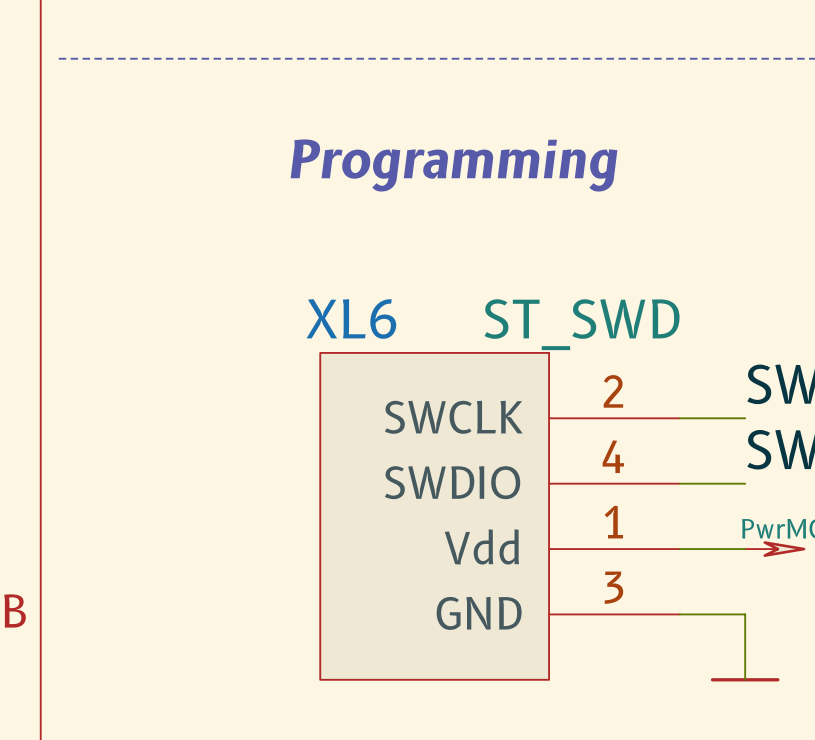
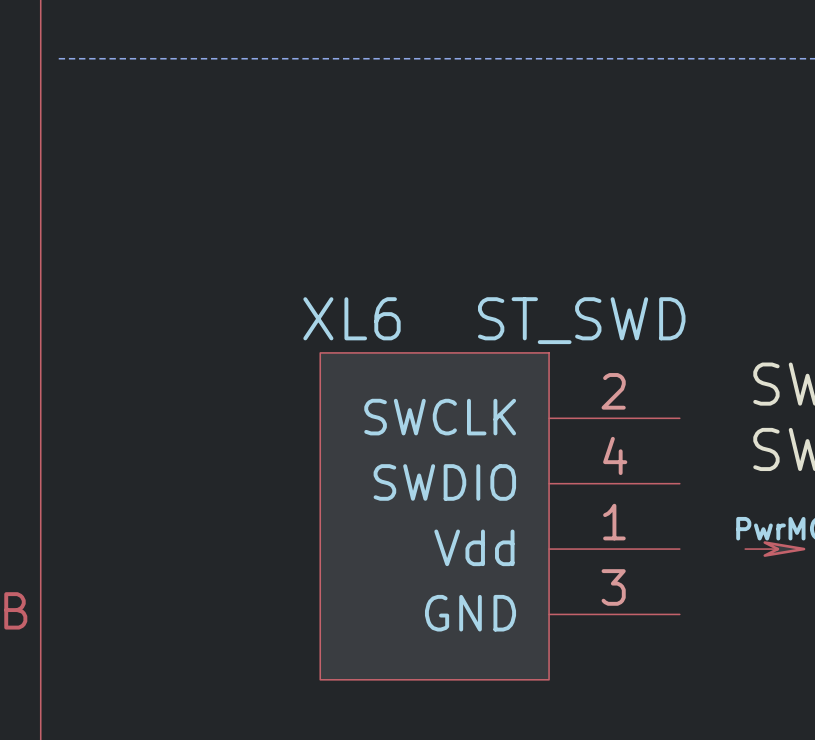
text: Programming (454, 165) -> none
wire: (679, 418) (745, 418) -> none
wire: (679, 483) (745, 483) -> none
wire: (679, 549) (745, 549) -> none
wire: (679, 614) (745, 614) (745, 679) -> none
power symbol: (745, 679) -> none

